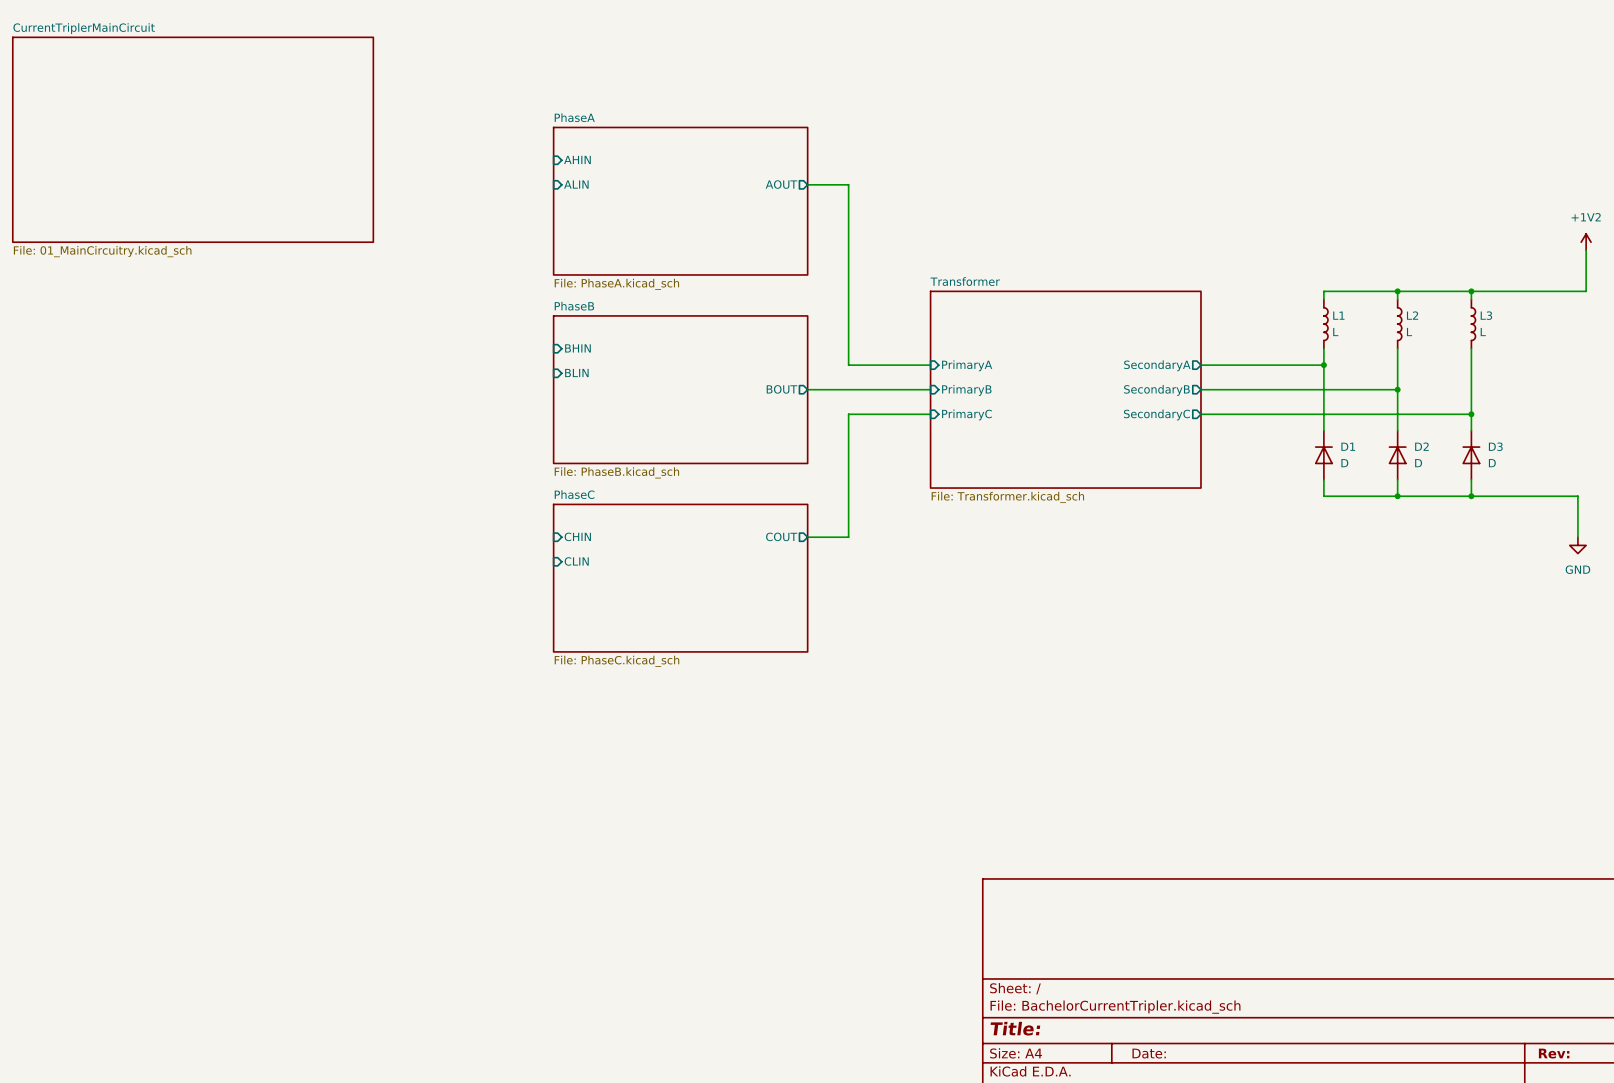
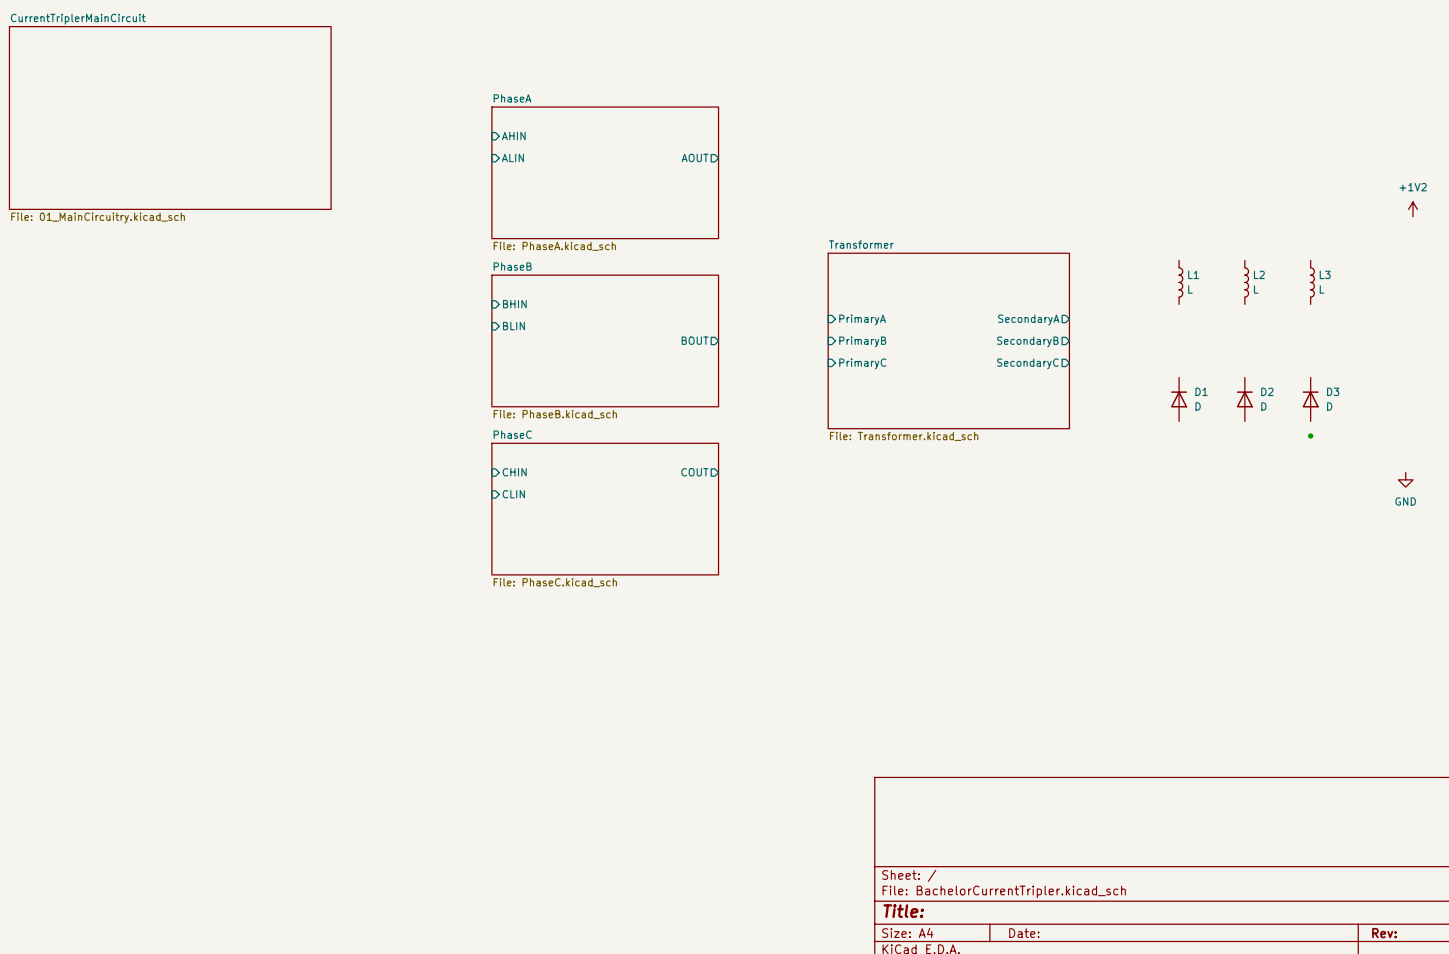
wire: (807, 184) (848, 184) (848, 365) (930, 365) -> none
wire: (1586, 250) (1586, 291) (1323, 291) (1323, 299) -> none
wire: (1397, 291) (1397, 299) -> none
junction: (1397, 291) -> none
wire: (1471, 291) (1471, 299) -> none
junction: (1471, 291) -> none
wire: (1323, 348) (1323, 430) -> none
wire: (1397, 348) (1397, 430) -> none
wire: (1471, 348) (1471, 430) -> none
wire: (1200, 365) (1323, 365) -> none
junction: (1323, 365) -> none
wire: (807, 389) (930, 389) -> none
wire: (1200, 389) (1397, 389) -> none
junction: (1397, 389) -> none
wire: (930, 414) (848, 414) (848, 537) (807, 537) -> none
wire: (1200, 414) (1471, 414) -> none
junction: (1471, 414) -> none
wire: (1323, 479) (1323, 496) (1577, 496) (1577, 537) -> none
wire: (1397, 479) (1397, 496) -> none
wire: (1471, 479) (1471, 496) -> none
junction: (1397, 496) -> none

